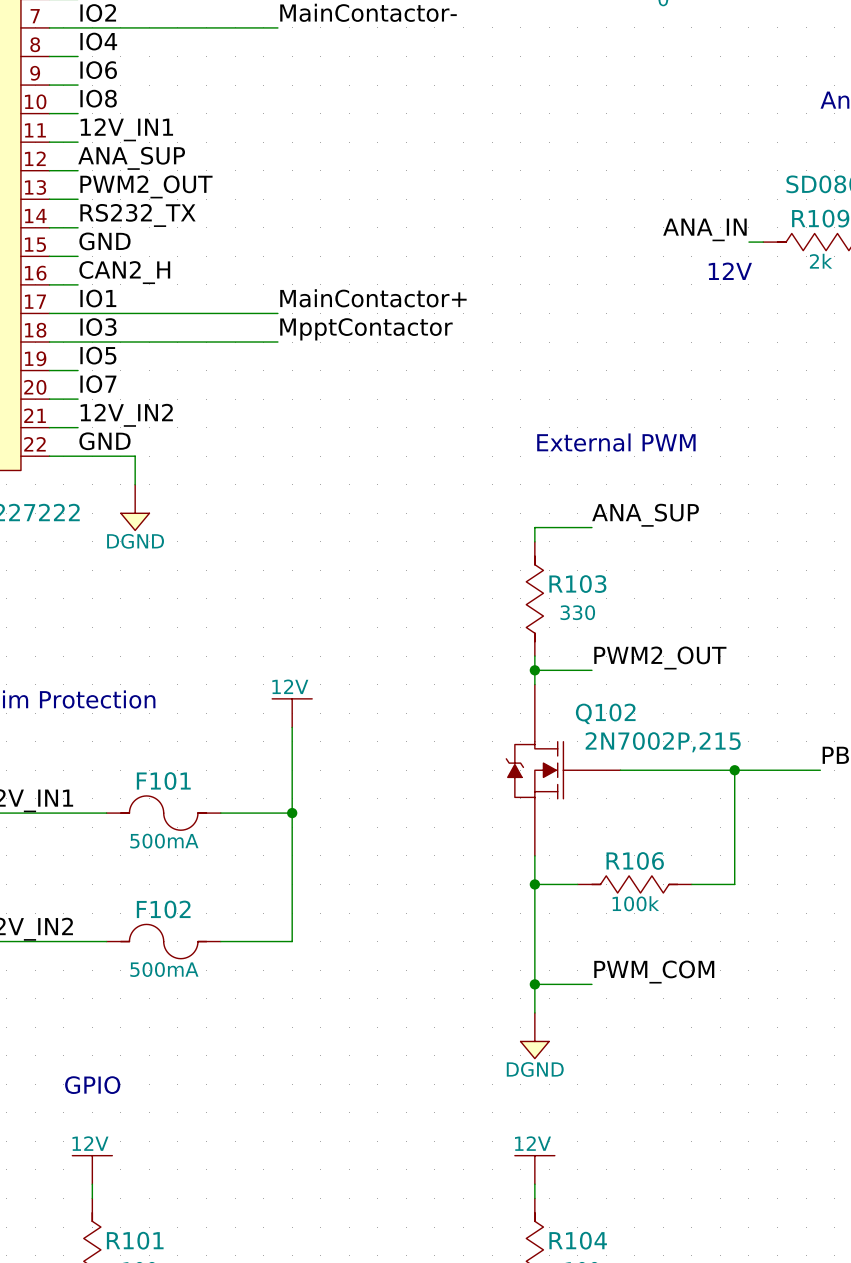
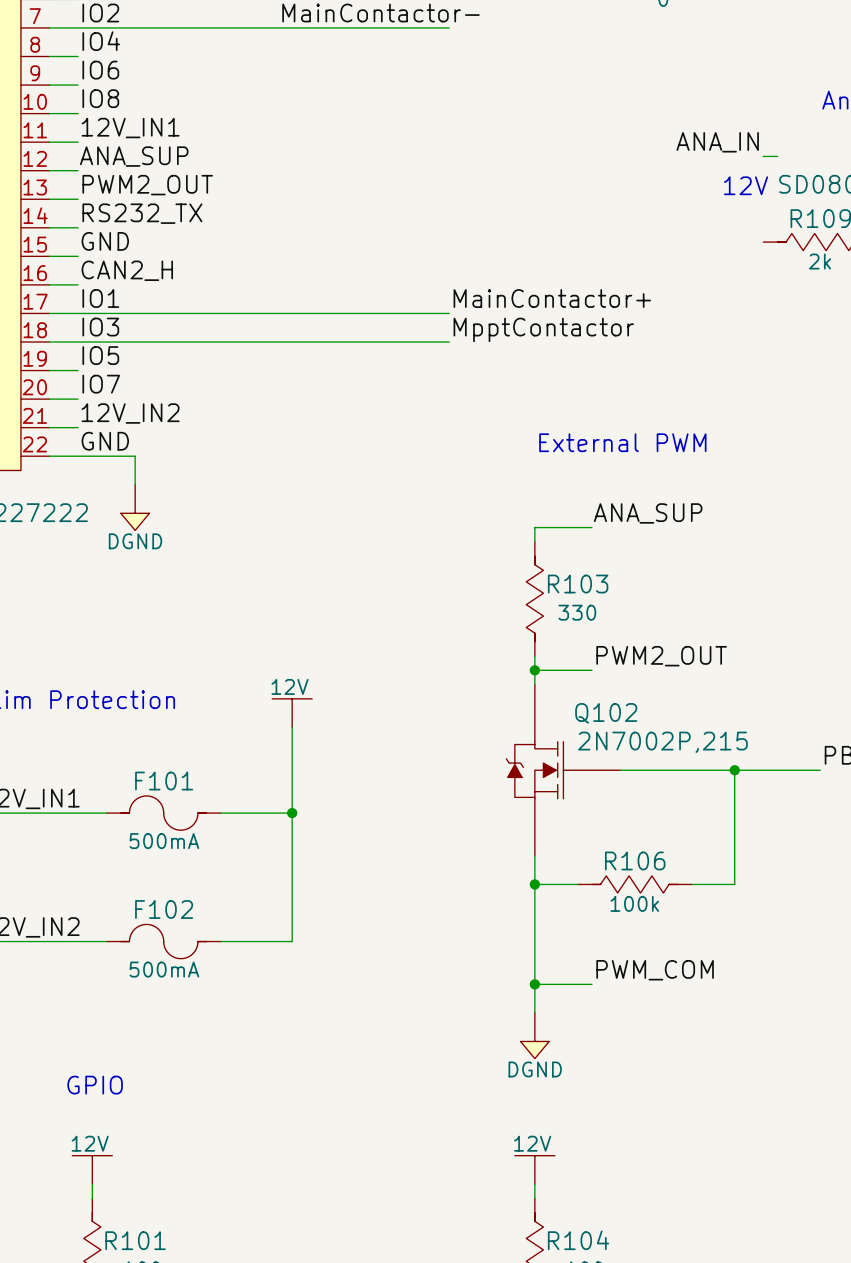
wire: none -> (277, 27) (449, 27)
label position: ANA_IN (704, 229) -> ANA_IN (717, 142)
wire: (748, 242) (763, 242) -> (763, 156) (777, 156)
text position: 12V (730, 271) -> 12V (746, 185)
label position: MainContactor+ (373, 298) -> MainContactor+ (552, 298)
wire: none -> (277, 313) (449, 313)
label position: MpptContactor (366, 329) -> MpptContactor (543, 329)
wire: none -> (277, 342) (449, 342)

